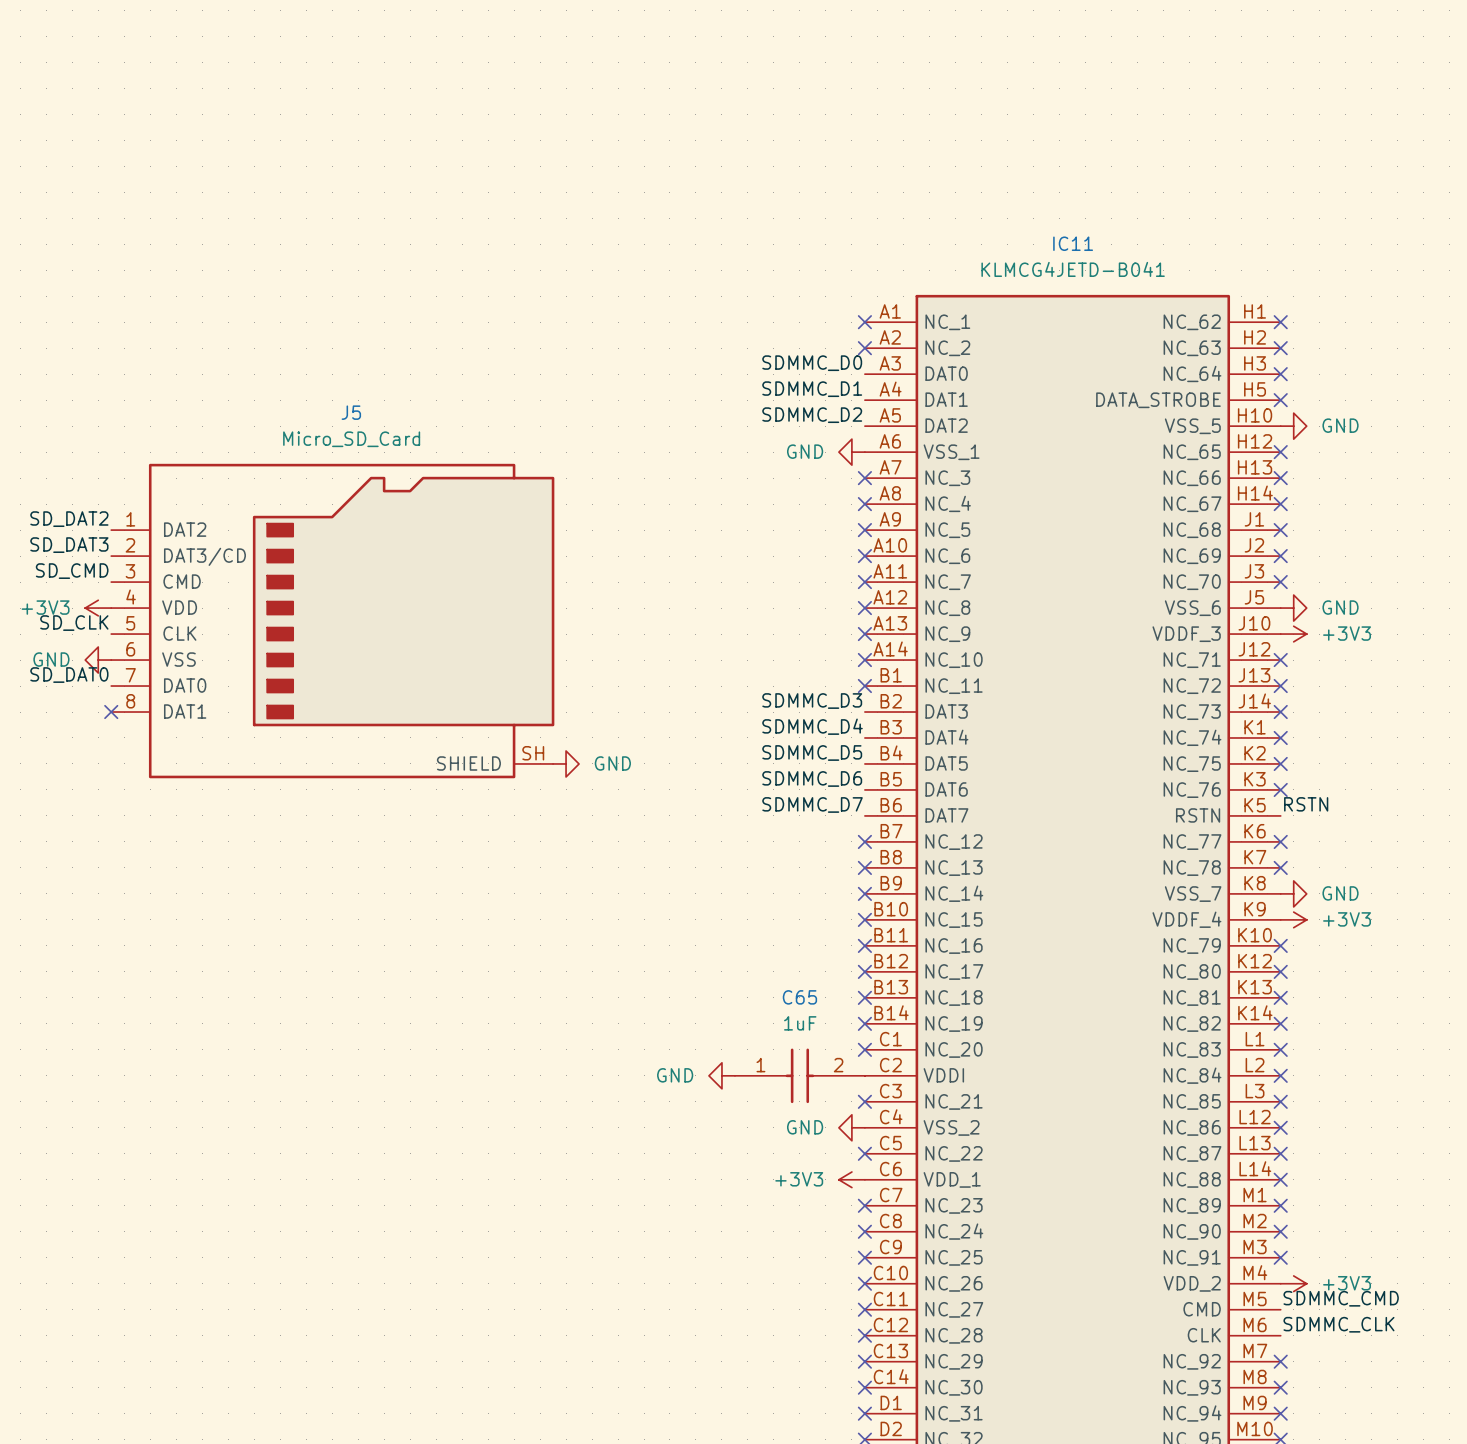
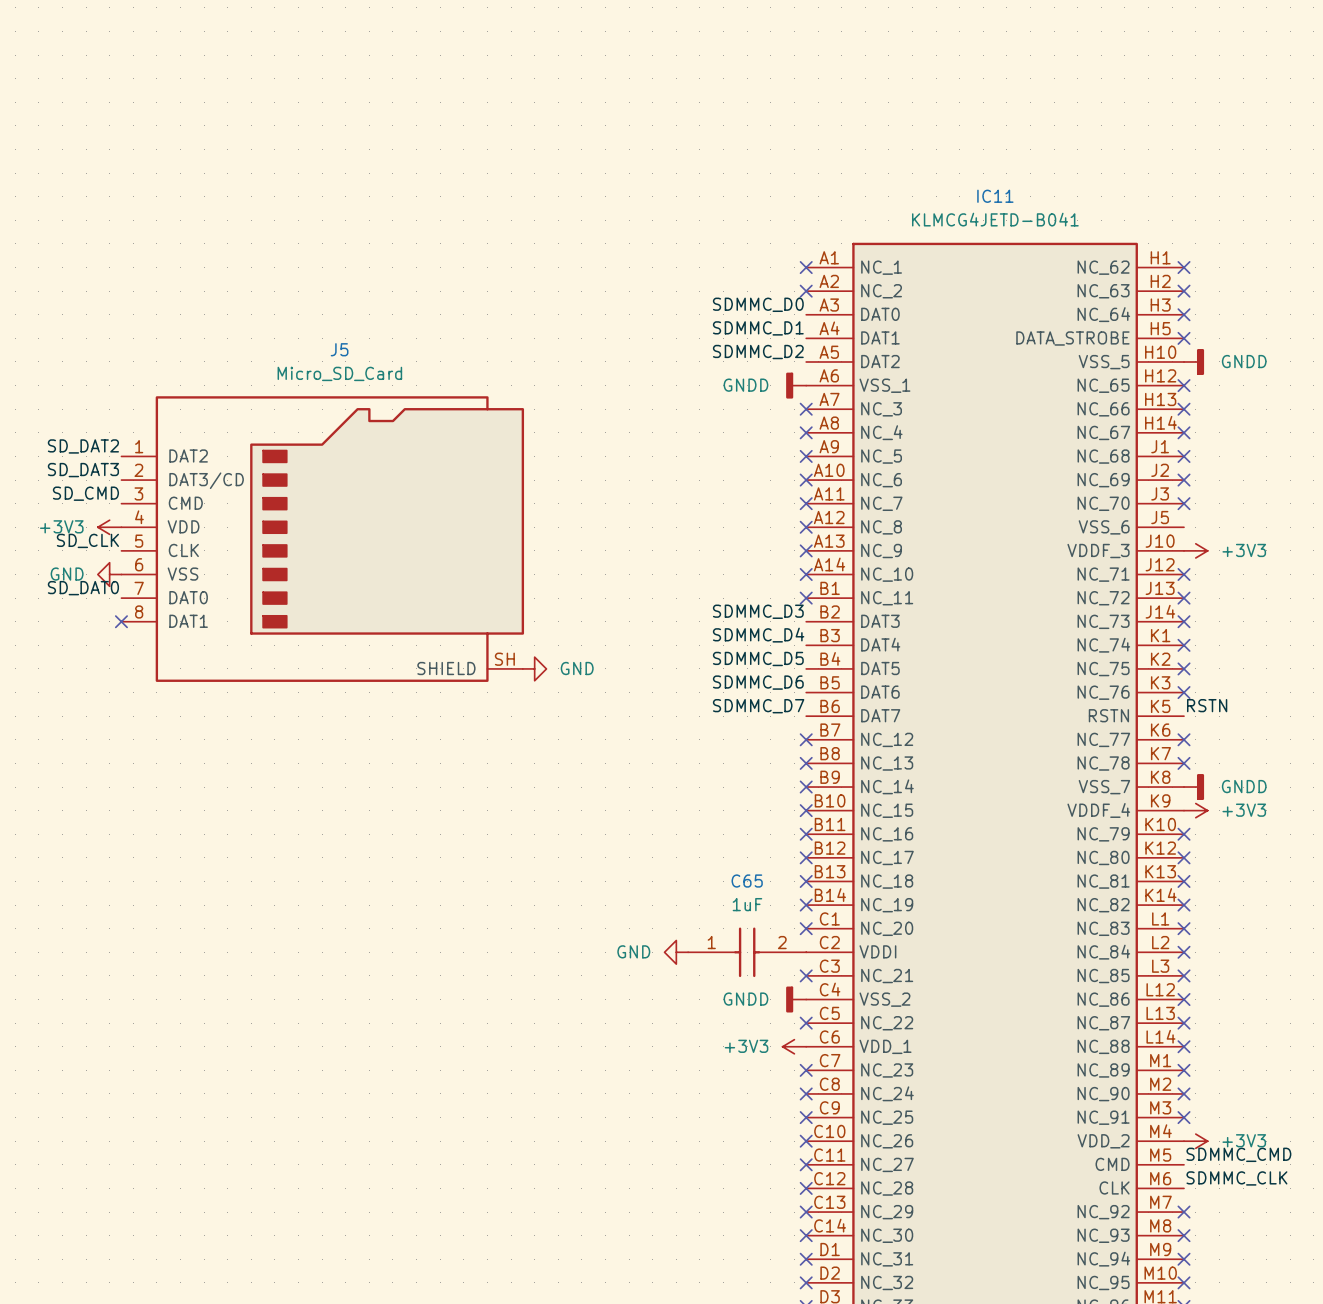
power symbol: GND (1293, 426) -> GNDD (1194, 361)
power symbol: GND (851, 452) -> GNDD (796, 385)
power symbol: GND (1293, 608) -> none
power symbol: GND (1293, 893) -> GNDD (1194, 787)
power symbol: GND (851, 1127) -> GNDD (796, 999)

